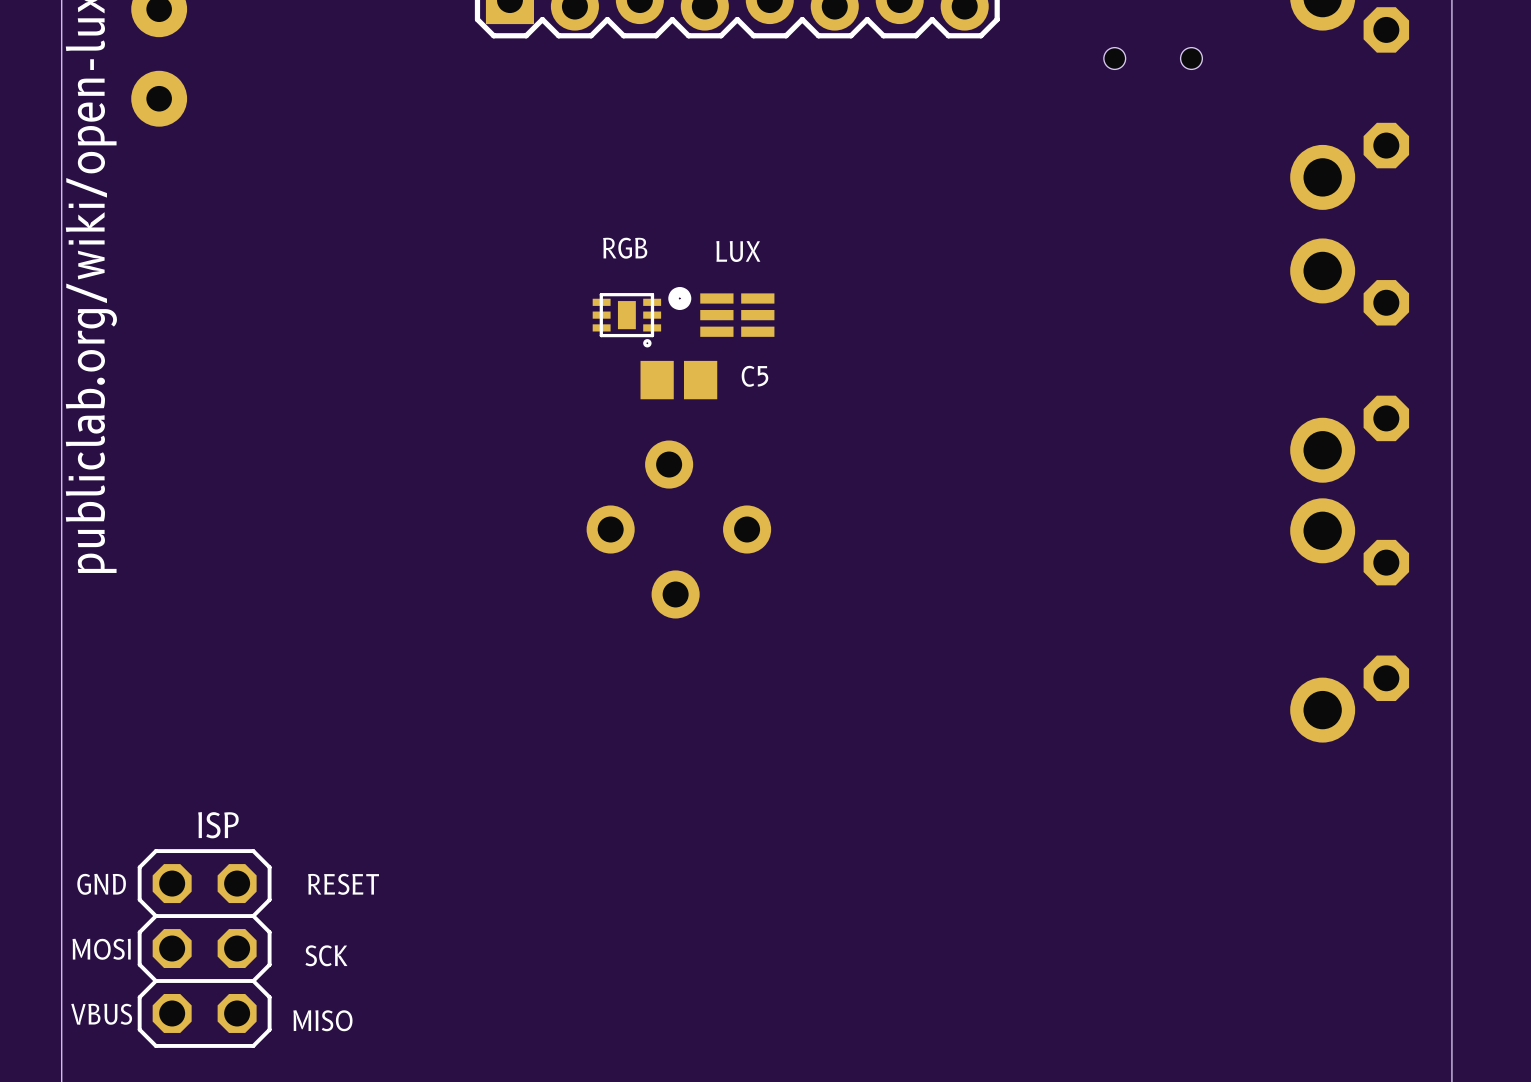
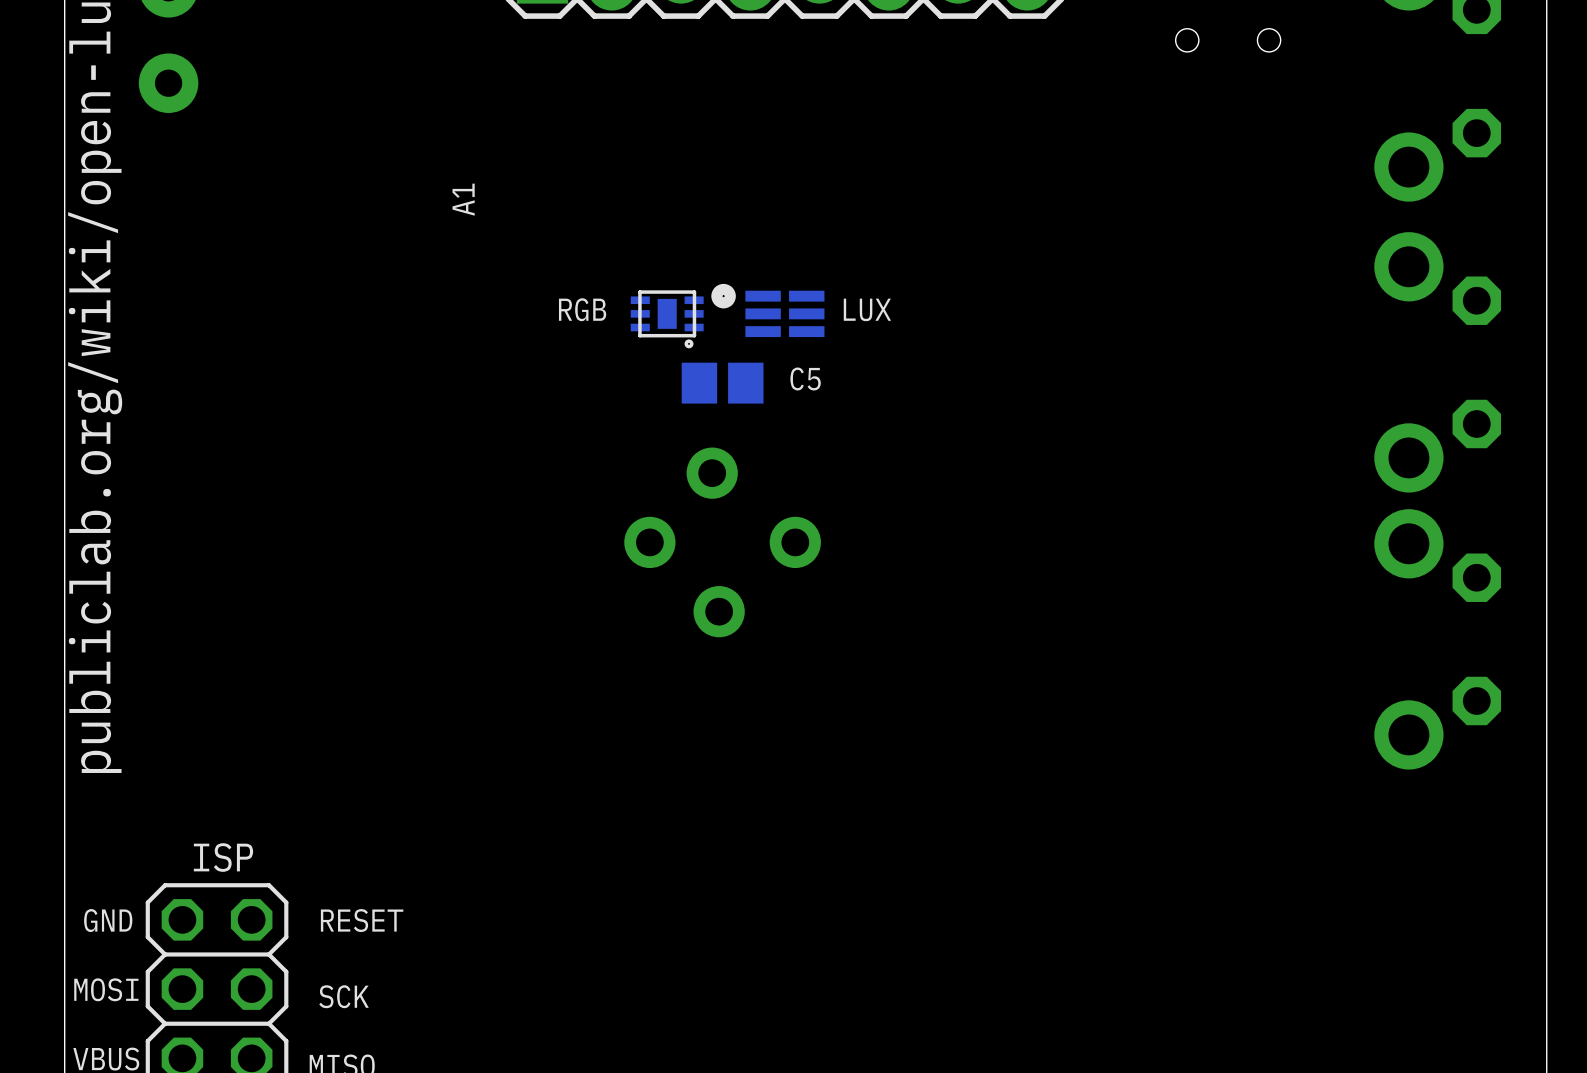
text: none -> A1 (463, 199)
text position: RGB (625, 248) -> RGB (582, 309)
text position: LUX (738, 251) -> LUX (867, 309)

